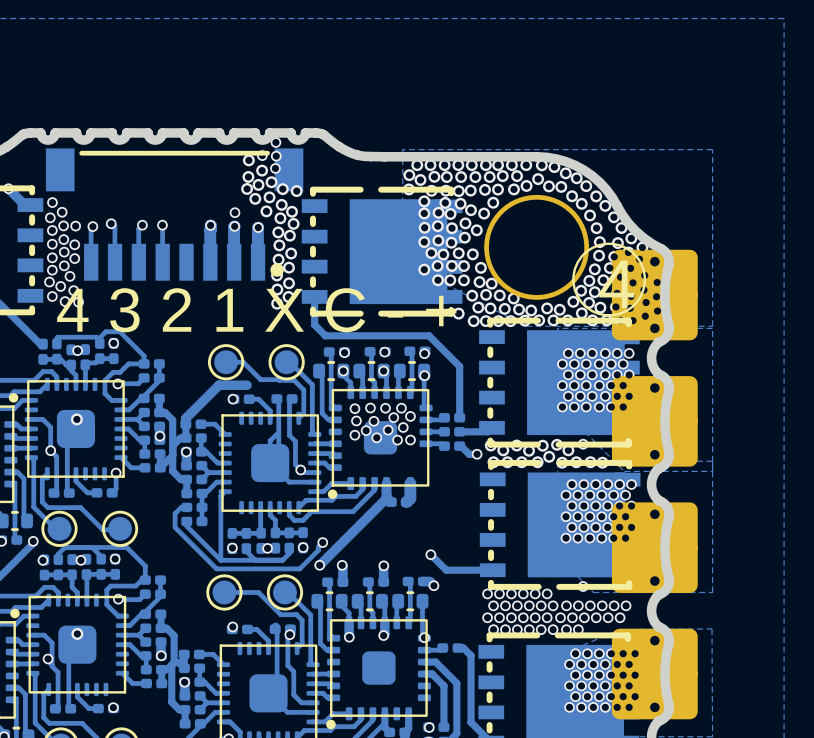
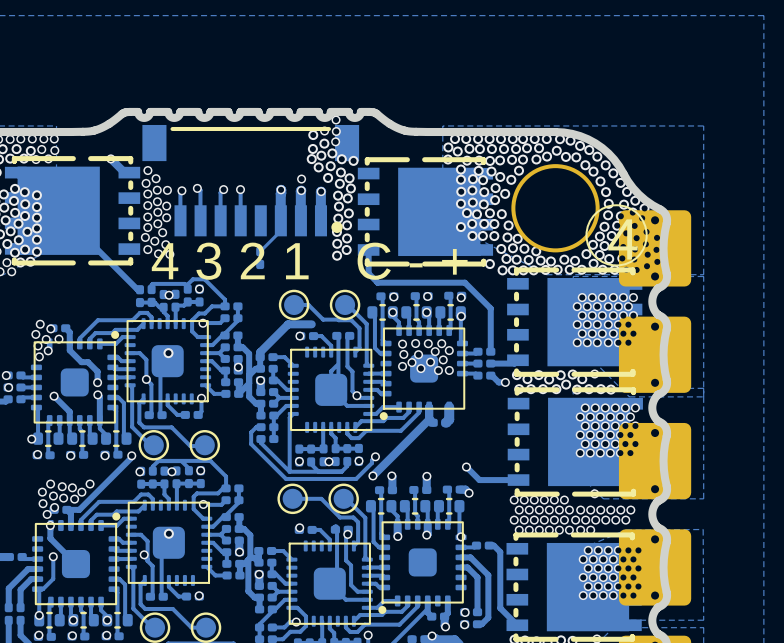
track: none -> (280, 220) (280, 230) (260, 251)
part: none -> (260, 258)
text: 4 3 2 1 X C - + (256, 310) -> 4 3 2 1 C - + (309, 261)

